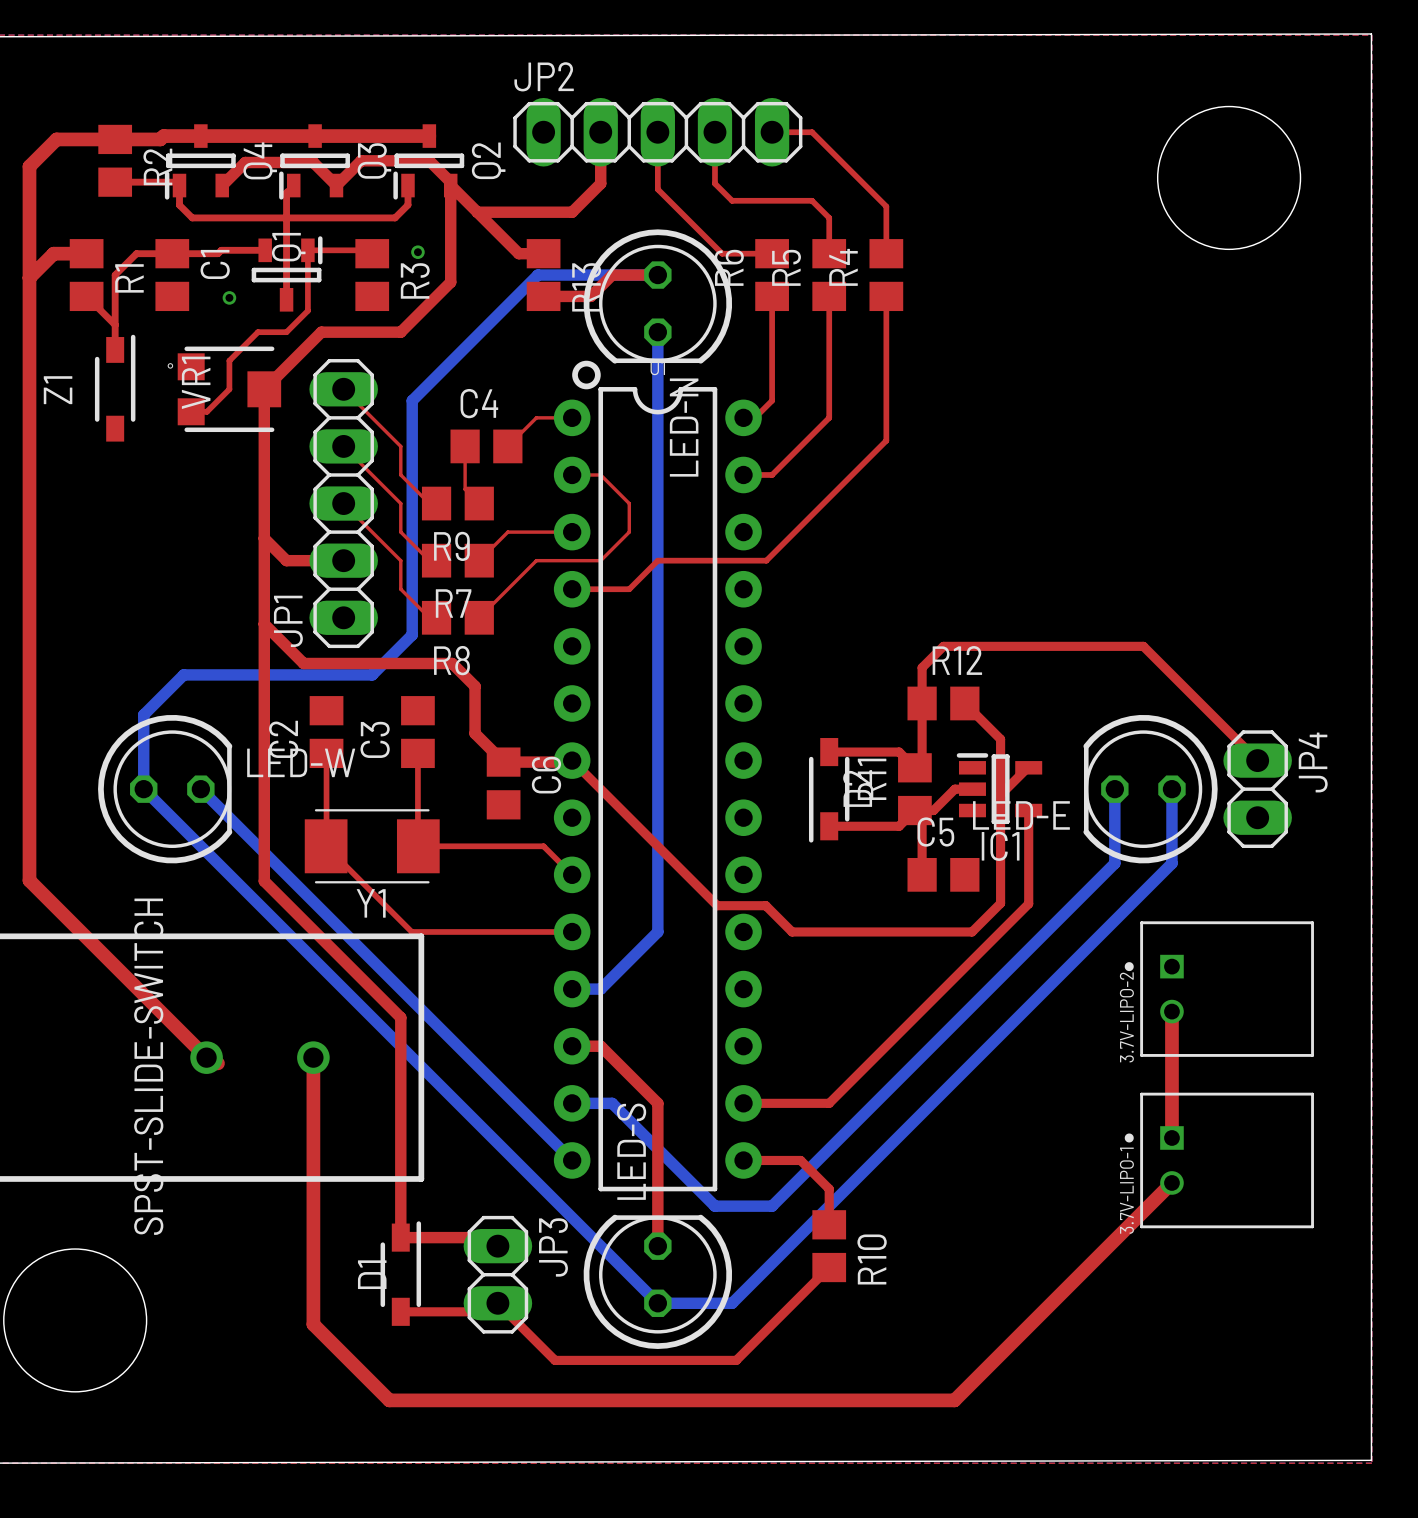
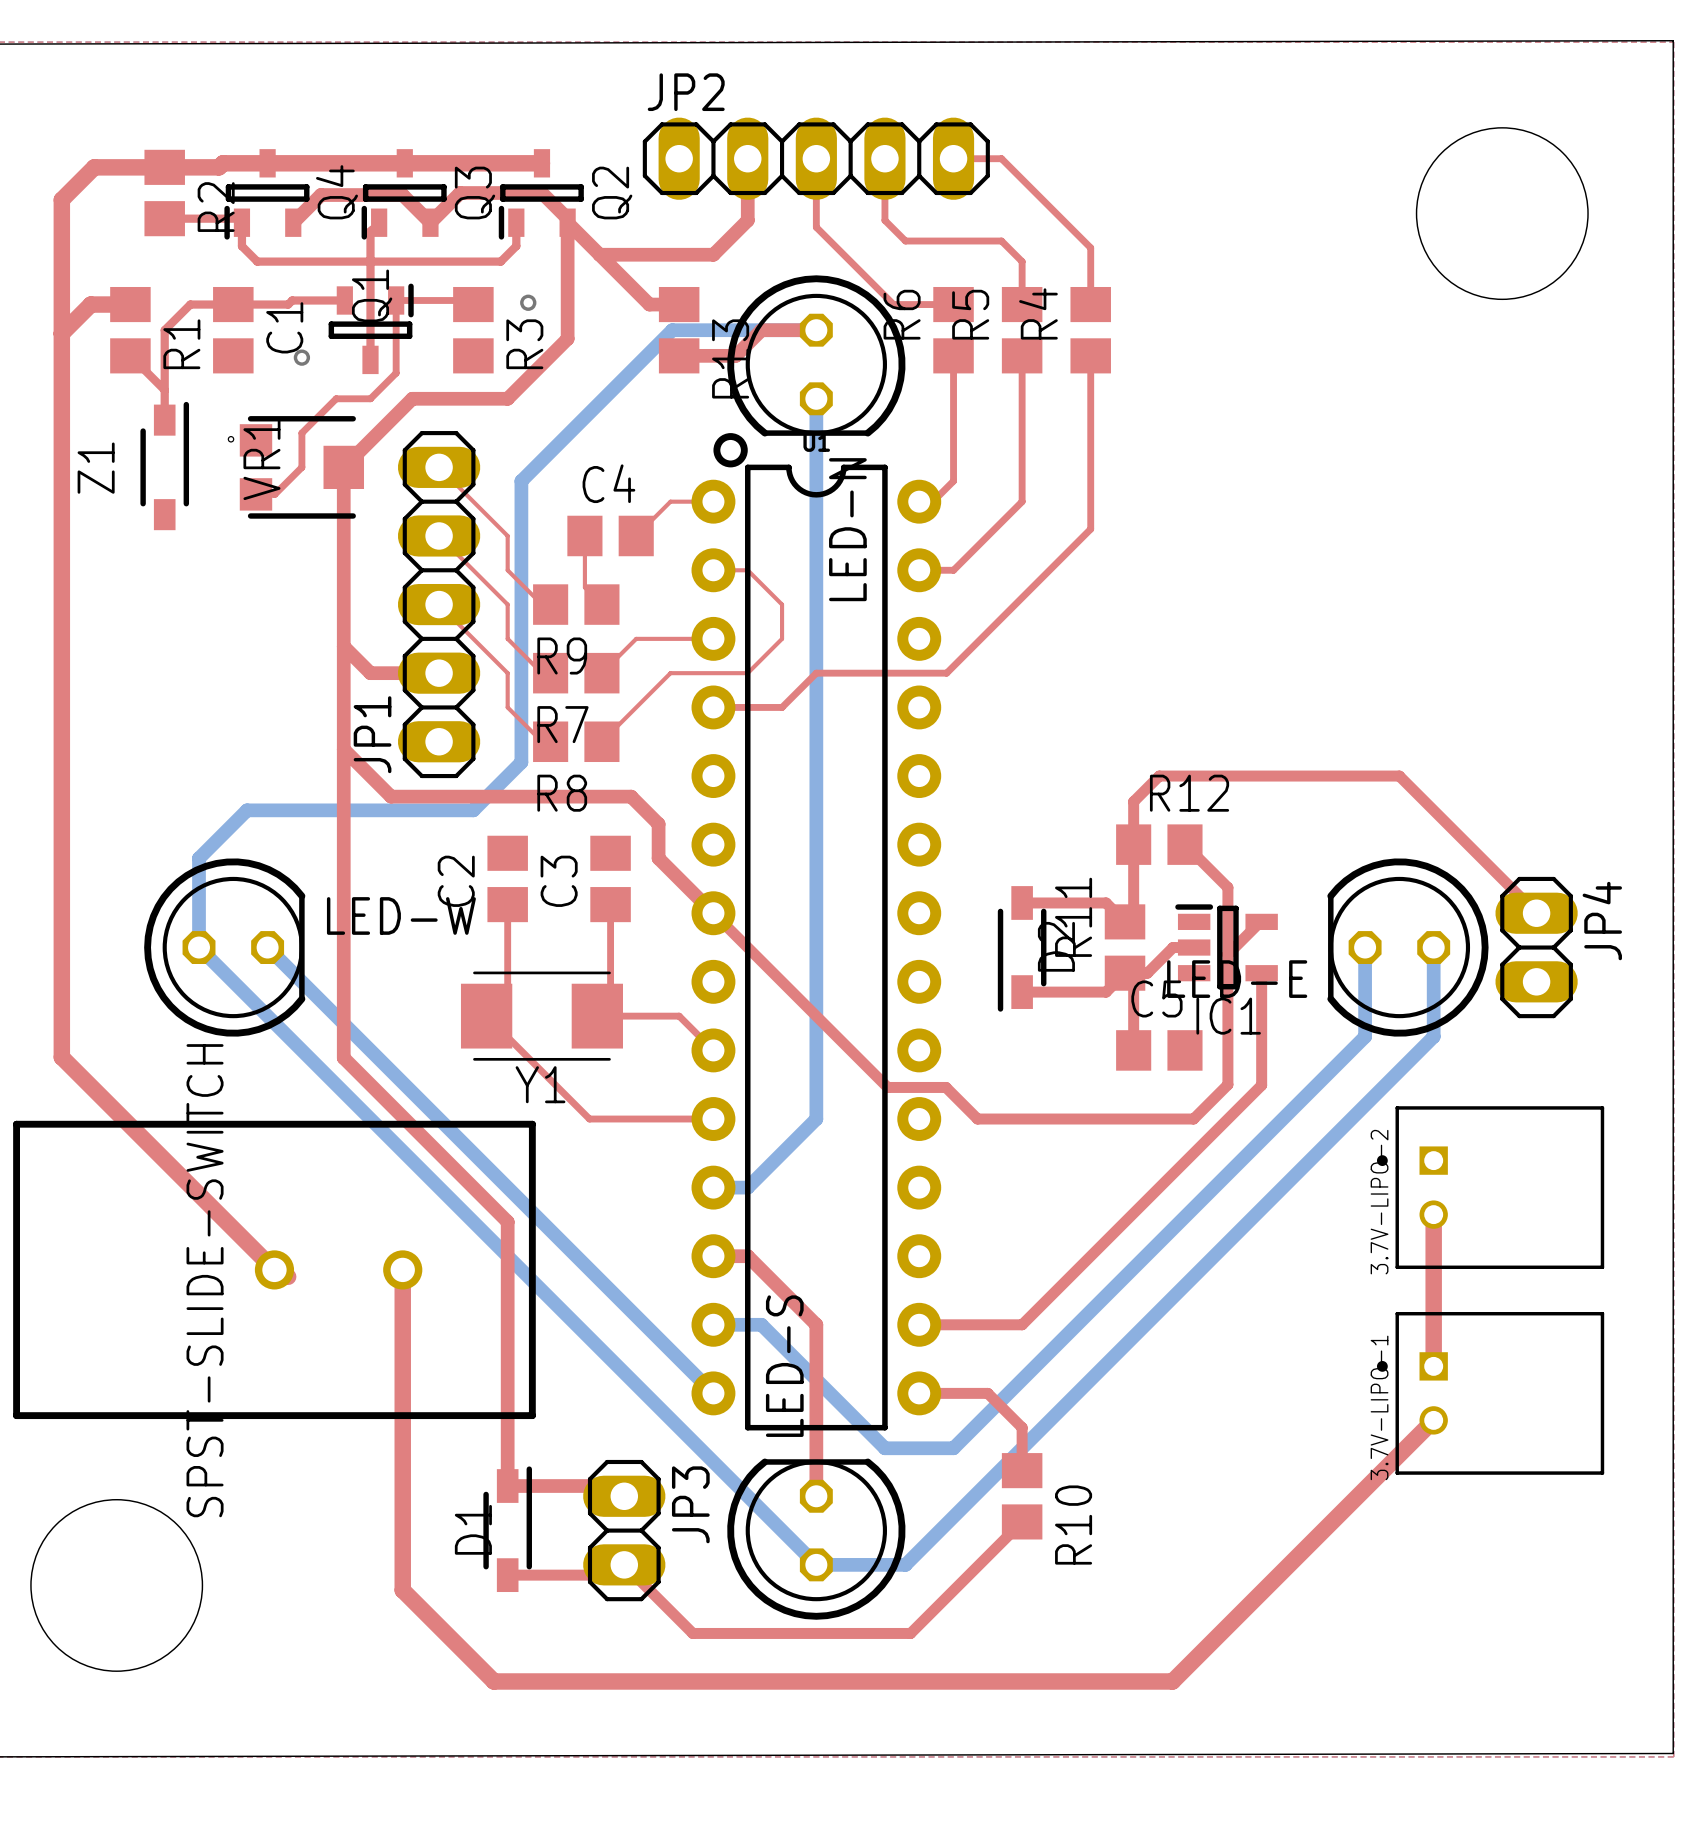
top track: (452, 663) (475, 686) (475, 733) (503, 762) (572, 760) -> (569, 796) (631, 796) (658, 824) (658, 858) (713, 913)
C2 position: (326, 732) -> (507, 878)
C3 position: (417, 732) -> (610, 878)
top track: (326, 753) (326, 846) (411, 931) (468, 931) -> (507, 904) (507, 995) (486, 1016) (589, 1119)
top track: (417, 753) (417, 845) (475, 846) -> (610, 904) (610, 1002) (597, 1016)
C6: (503, 783) -> none
Y1 position: (372, 846) -> (541, 1016)

